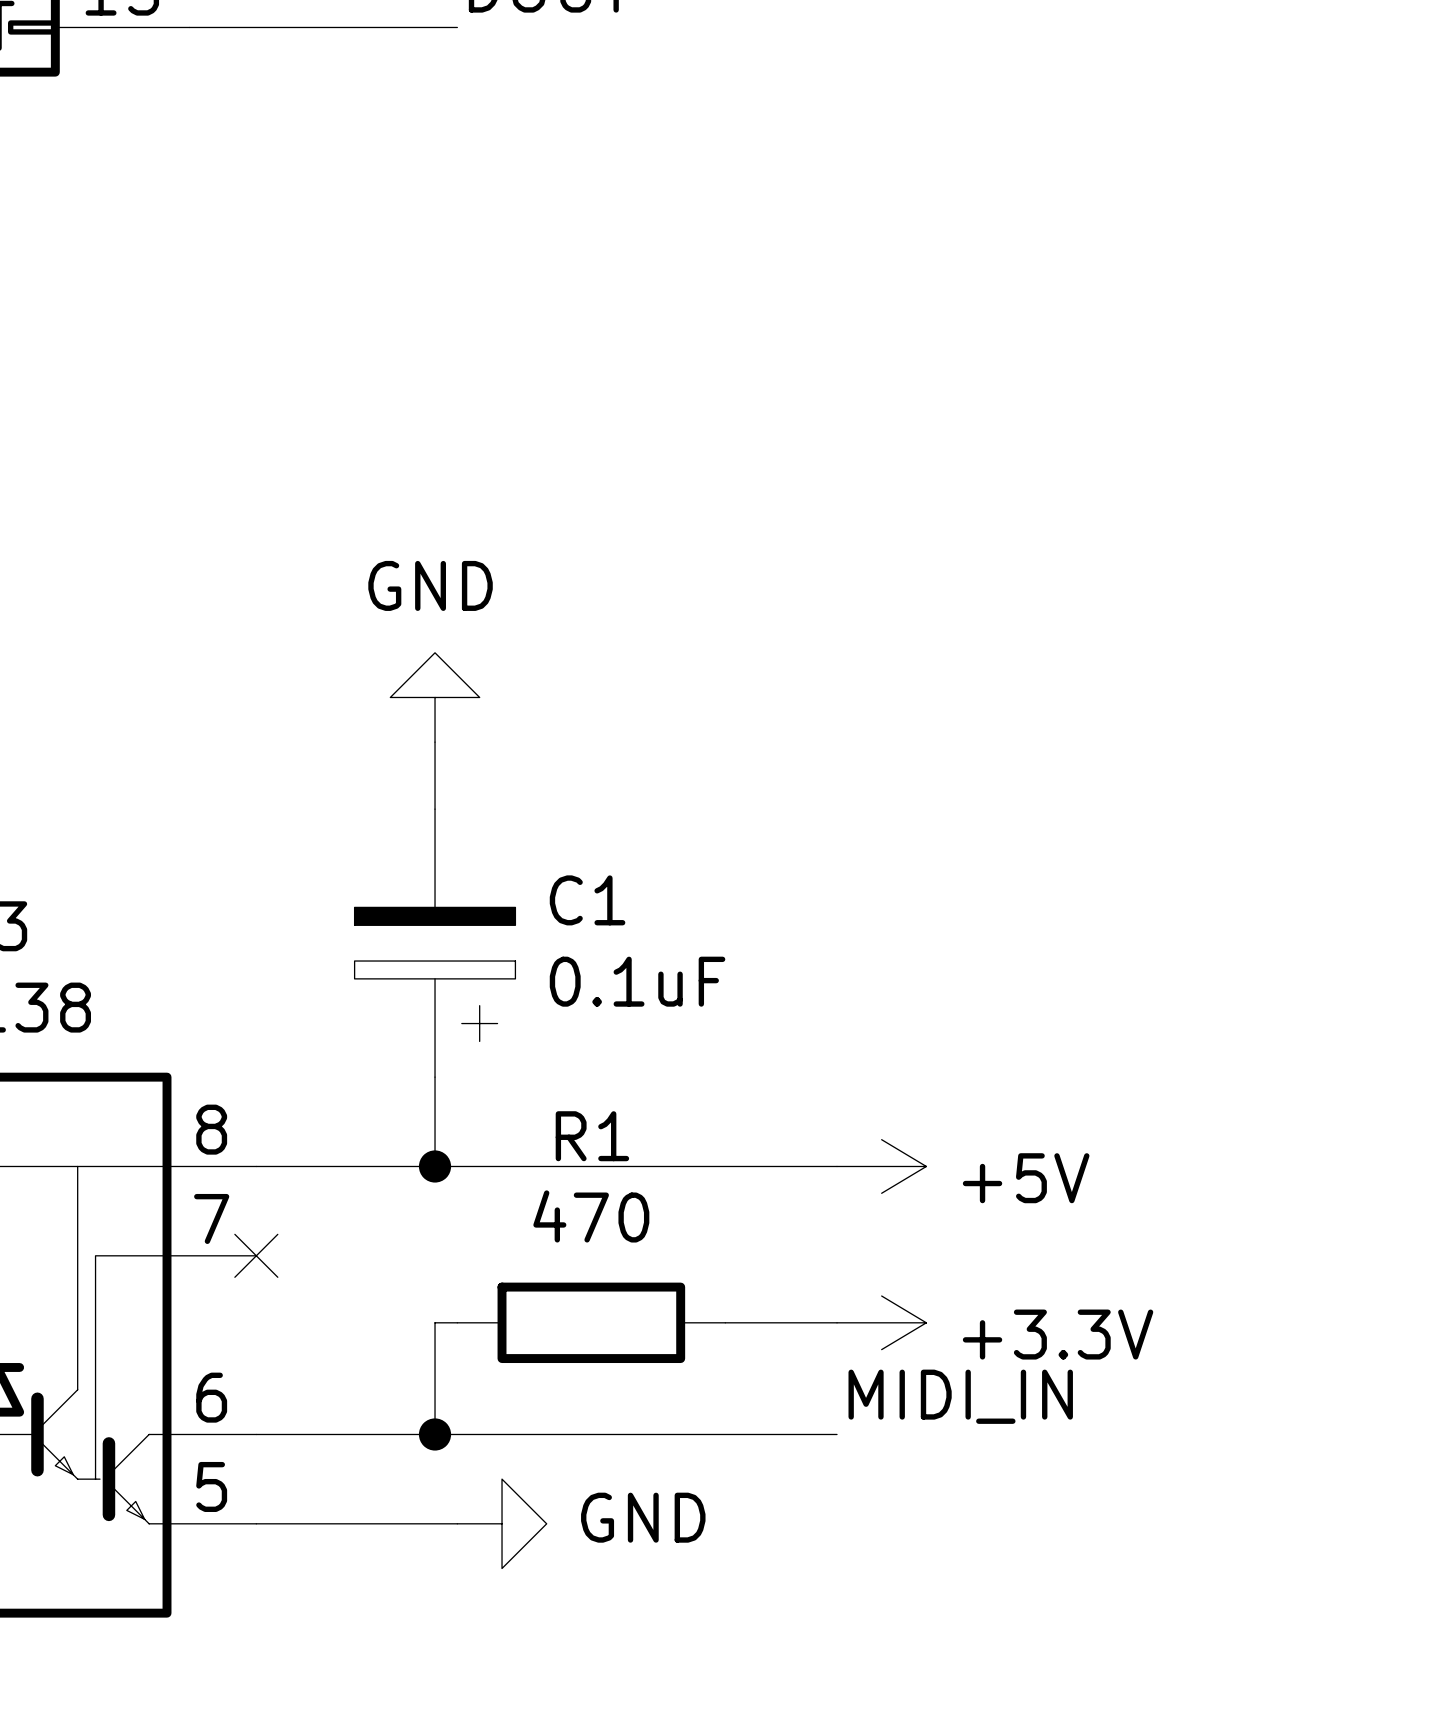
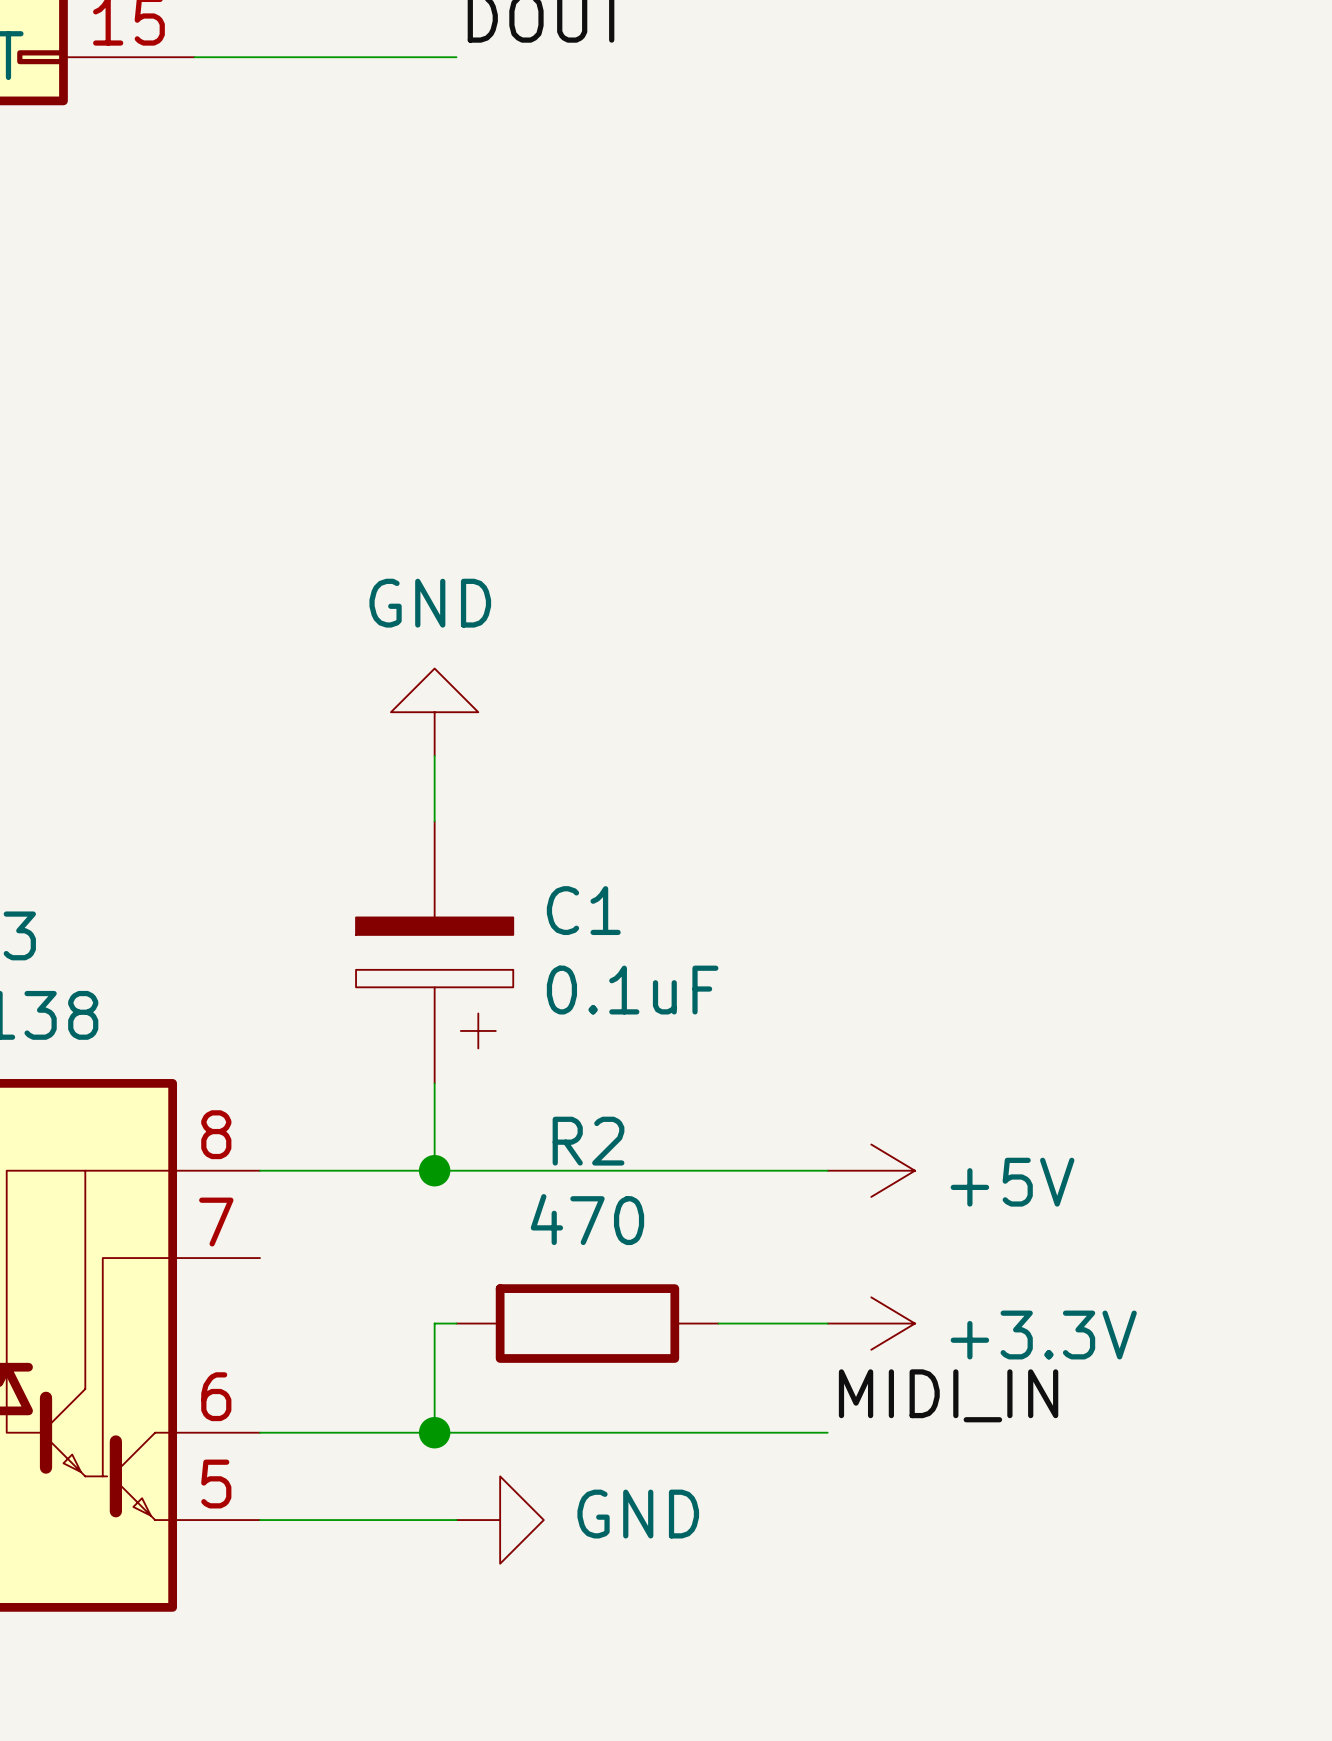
R1 name: R1 (592, 1136) -> R2 (588, 1141)
no-connect mark: (256, 1255) -> none

